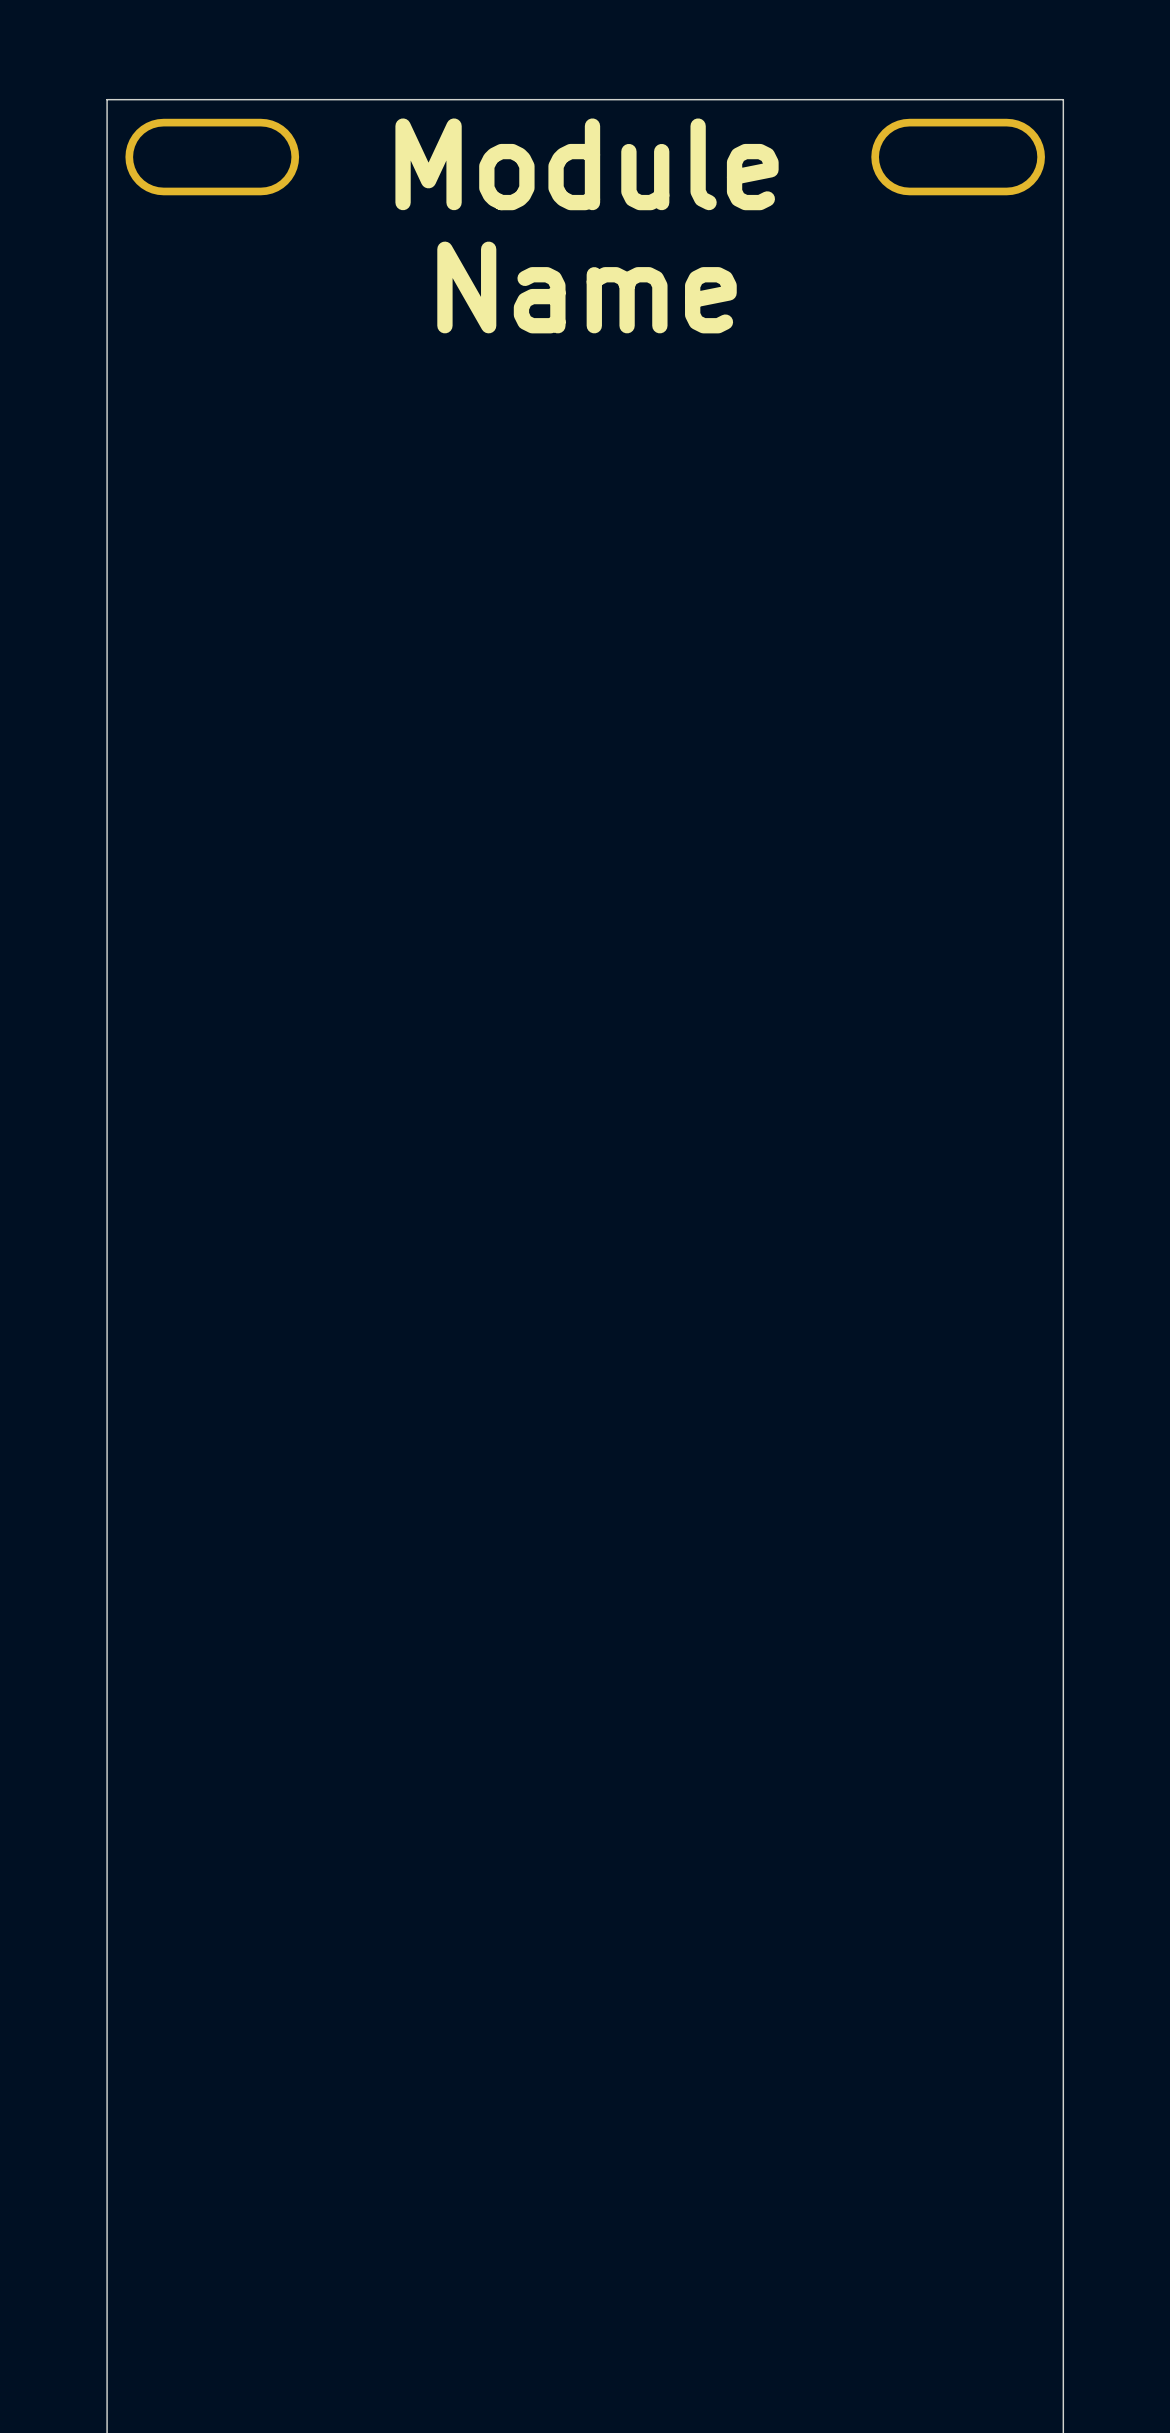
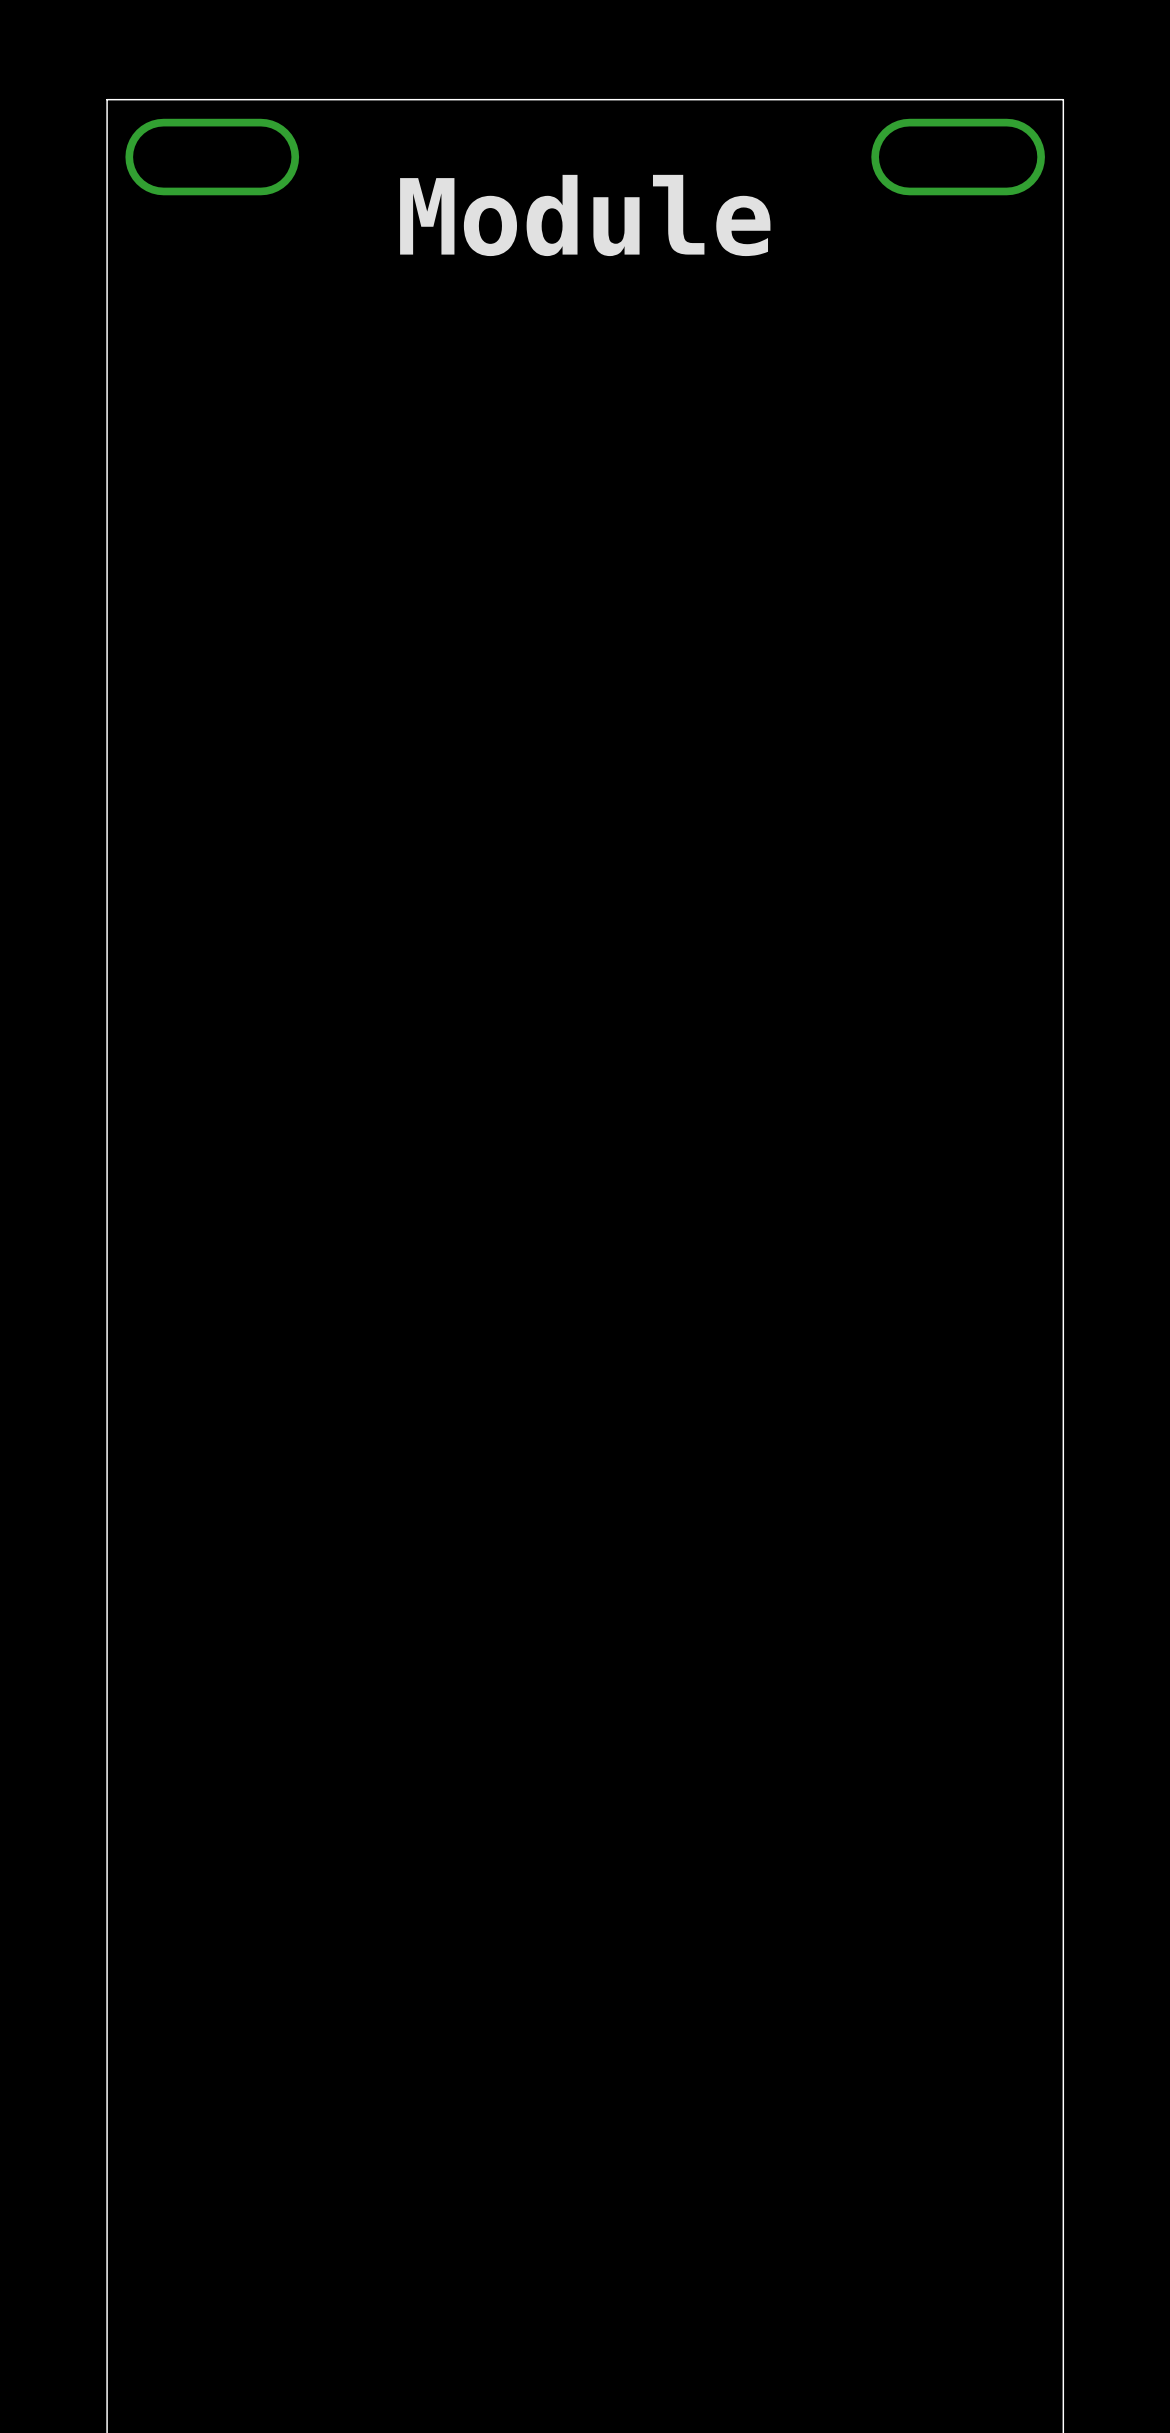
text position: Module (587, 164) -> Module (585, 215)
text: Name (587, 287) -> none

